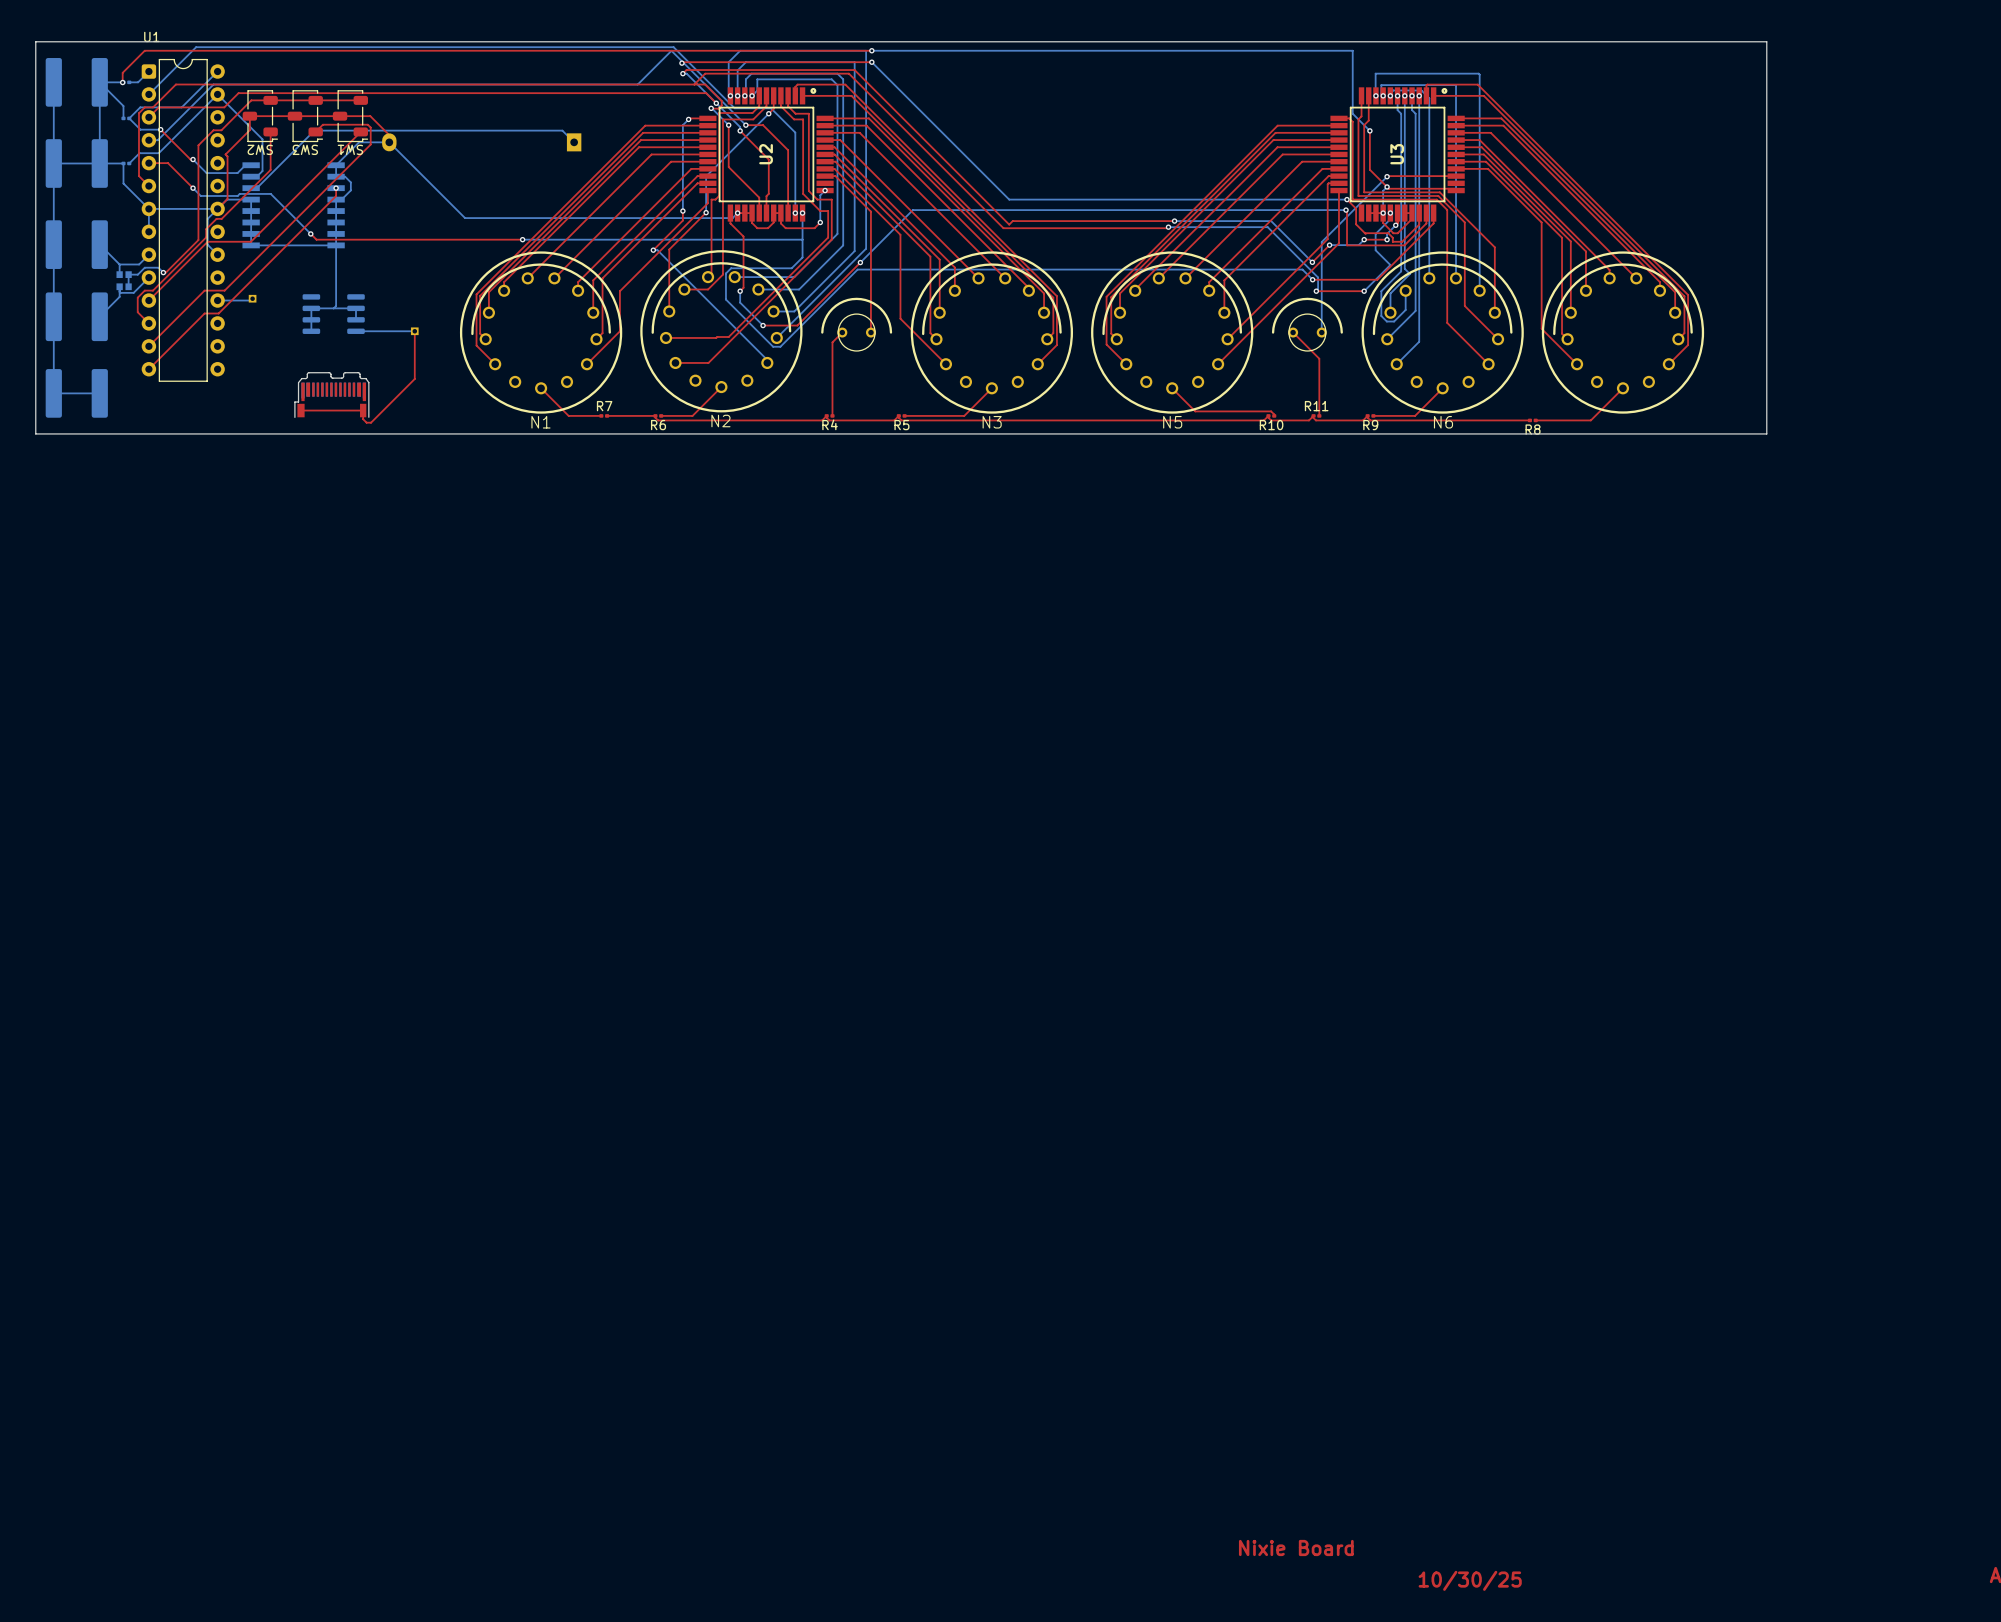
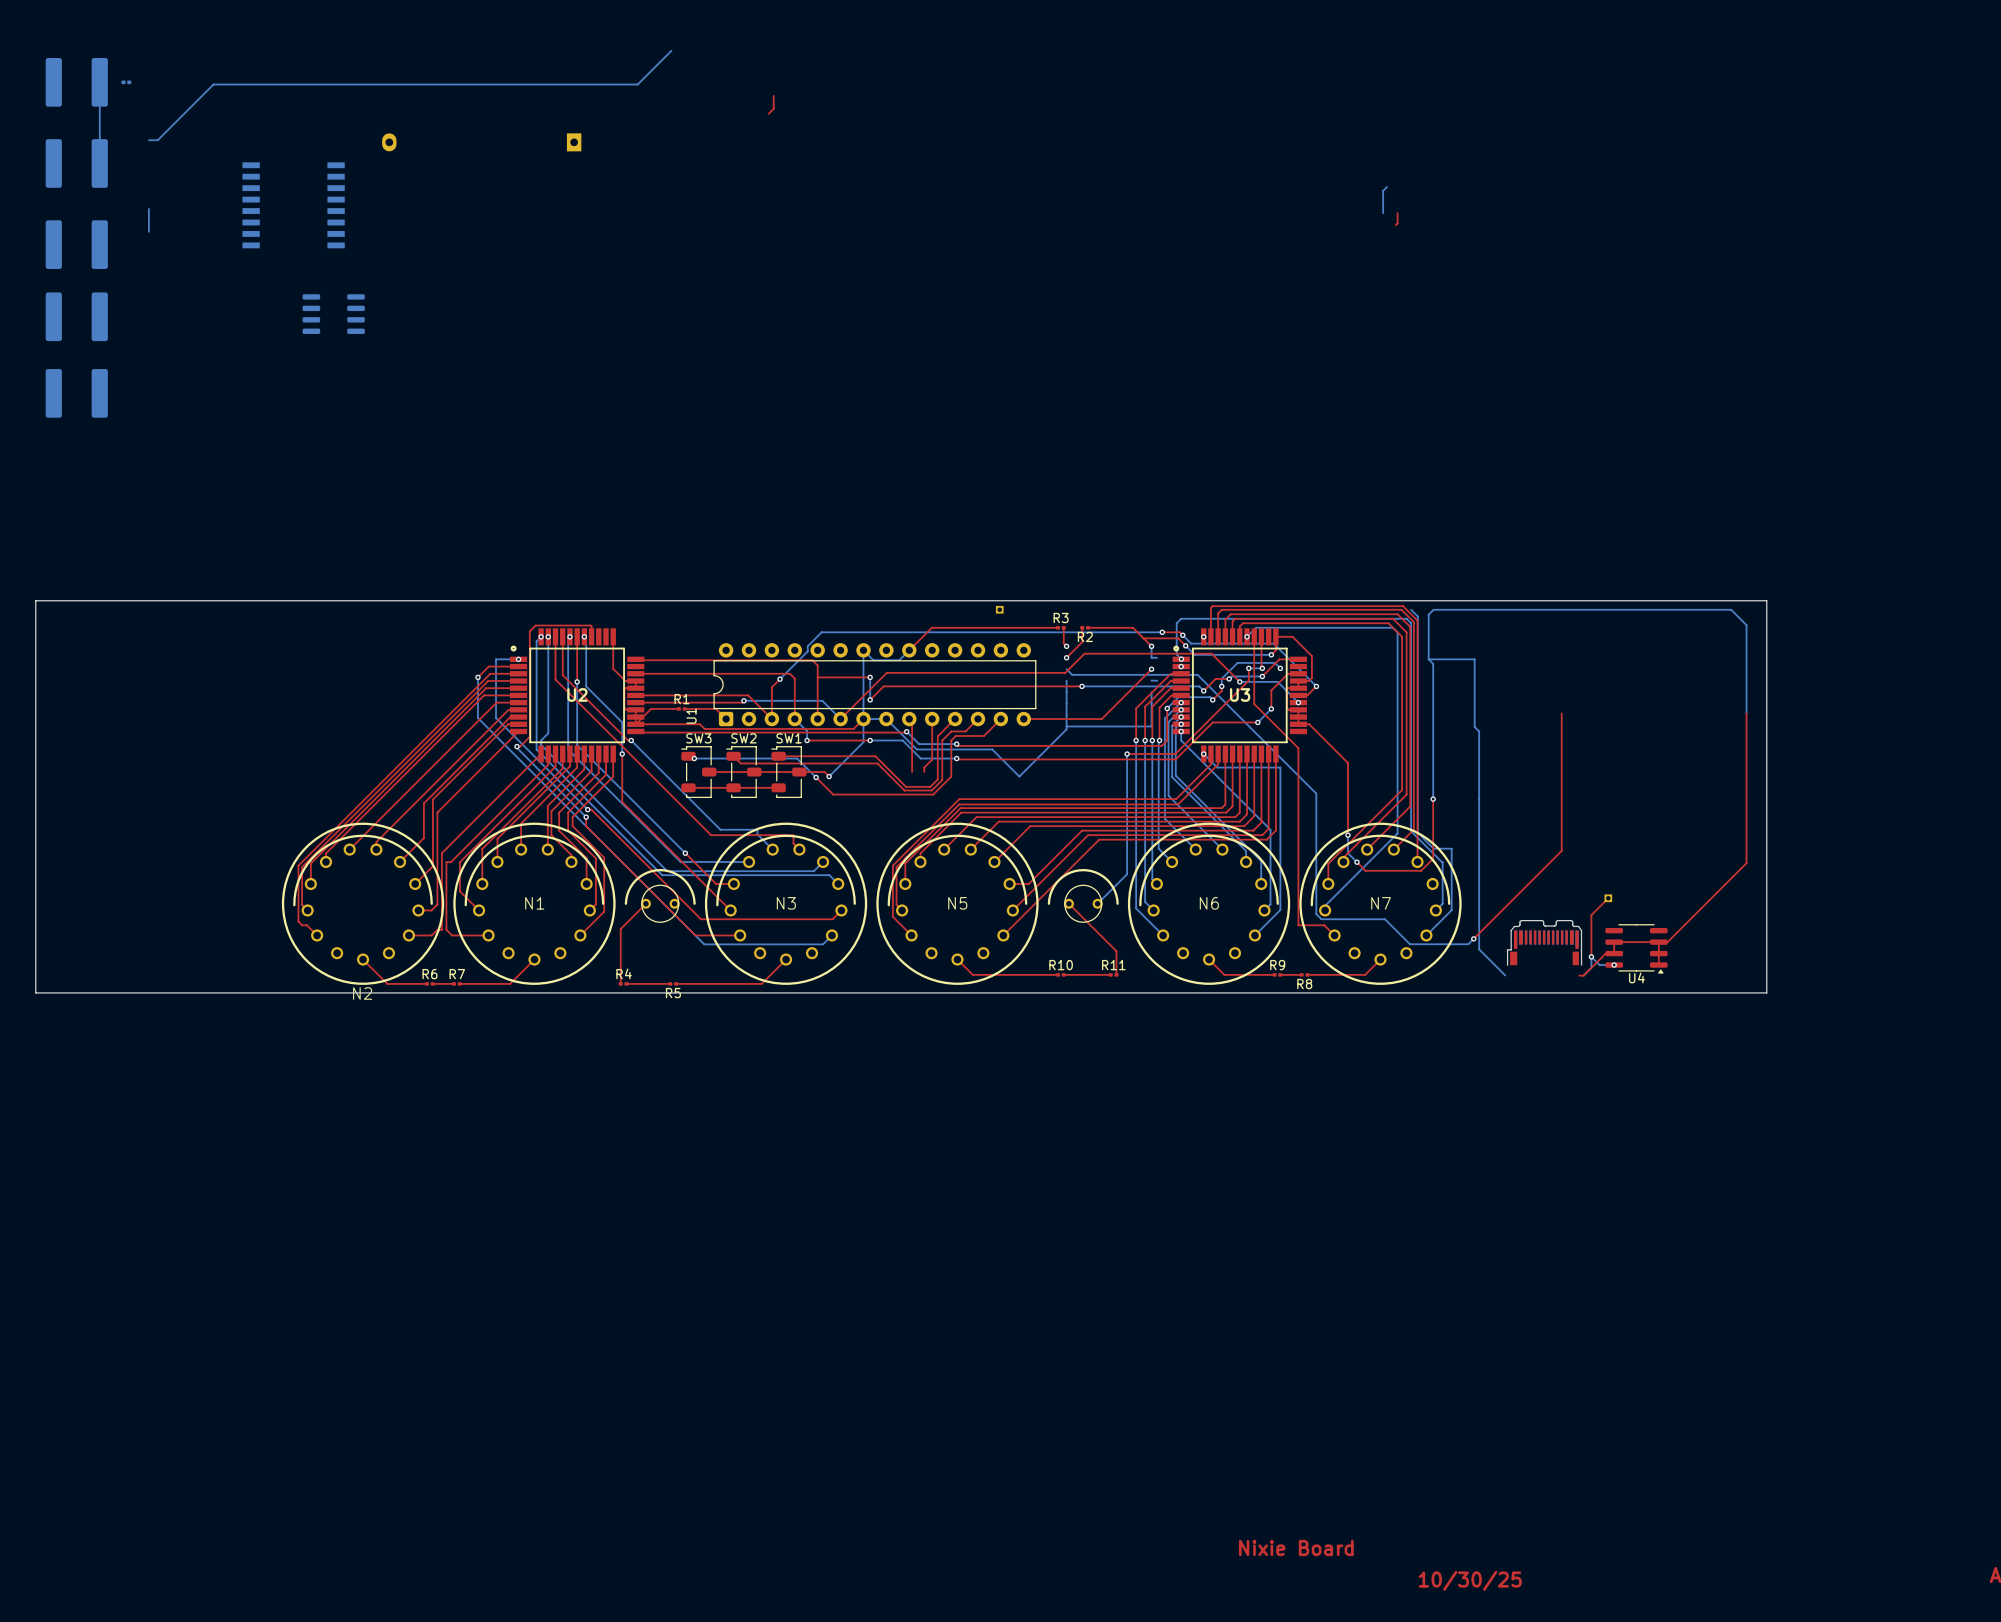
board edge: (35, 41) (1766, 41) (1766, 433) (35, 433) (35, 41) -> none
bottom track: (671, 50) (745, 125) -> none
bottom track: (871, 50) (1352, 50) (1352, 113) (1369, 130) -> none
top track: (871, 50) (144, 50) (122, 72) (122, 82) -> none
via: (871, 50) -> none
bottom track: (871, 62) (1009, 199) (1347, 199) -> none
top track: (871, 62) (681, 63) -> none
via: (871, 62) -> none
via: (681, 63) -> none
bottom track: (148, 71) (138, 82) (129, 82) -> none
bottom track: (217, 71) (181, 107) (140, 107) (129, 118) (140, 129) (160, 129) -> none
bottom track: (682, 73) (686, 73) (740, 127) (740, 130) -> none
top track: (682, 73) (686, 70) (854, 70) (1009, 224) (1012, 221) (1174, 221) -> none
via: (682, 73) -> none
bottom track: (53, 82) (53, 393) (99, 393) -> none
via: (122, 82) -> none
bottom track: (123, 82) (99, 82) (123, 106) (123, 118) -> none
top track: (694, 84) (705, 73) (848, 73) (1003, 228) (1168, 227) -> none
bottom track: (148, 94) (196, 47) (673, 47) (734, 108) (771, 108) (795, 132) (795, 213) -> none
bottom track: (730, 95) (728, 94) (728, 62) (740, 50) (866, 50) (866, 248) (776, 337) -> none
via: (730, 95) -> none
bottom track: (737, 95) (737, 70) (745, 62) (854, 62) (854, 251) (794, 311) (773, 311) -> none
via: (737, 95) -> none
bottom track: (744, 95) (745, 79) (751, 73) (837, 73) (843, 79) (843, 245) (799, 289) (758, 289) -> none
via: (744, 95) -> none
bottom track: (752, 95) (757, 90) (757, 79) (831, 79) (837, 85) (837, 233) (794, 277) (734, 277) -> none
via: (752, 95) -> none
top track: (759, 95) (759, 106) (752, 112) (719, 112) (719, 195) (715, 199) (711, 199) (711, 273) (708, 277) -> none
top track: (766, 95) (766, 106) (753, 119) (722, 119) (722, 274) (708, 289) (684, 289) -> none
top track: (780, 95) (780, 106) (794, 119) (803, 119) (803, 193) (820, 211) (828, 211) (828, 237) (728, 336) (666, 337) -> none
top track: (788, 95) (788, 106) (795, 113) (808, 113) (808, 191) (817, 199) (831, 199) (831, 239) (708, 362) (675, 362) -> none
top track: (795, 95) (795, 86) (797, 84) (845, 84) (1056, 296) (1056, 345) (1037, 364) -> none
top track: (802, 95) (851, 95) (1053, 297) (1053, 333) (1047, 339) -> none
top track: (1361, 95) (1361, 116) (1358, 119) (1358, 195) (1438, 195) (1464, 222) (1464, 305) (1498, 339) -> none
top track: (1368, 95) (1368, 120) (1364, 125) (1364, 192) (1439, 192) (1494, 247) (1494, 312) -> none
bottom track: (1375, 95) (1375, 73) (1479, 74) (1479, 290) -> none
via: (1375, 95) -> none
bottom track: (1383, 95) (1381, 85) (1456, 85) (1456, 278) -> none
via: (1383, 95) -> none
bottom track: (1390, 95) (1393, 90) (1421, 90) (1429, 98) (1429, 278) -> none
via: (1390, 95) -> none
via: (1397, 95) -> none
bottom track: (1404, 95) (1404, 268) (1409, 274) (1390, 293) (1390, 312) -> none
via: (1404, 95) -> none
bottom track: (1412, 95) (1412, 110) (1415, 113) (1415, 310) (1387, 339) -> none
via: (1412, 95) -> none
bottom track: (1419, 95) (1419, 341) (1396, 364) -> none
via: (1419, 95) -> none
top track: (1426, 95) (1427, 84) (1477, 84) (1688, 294) (1688, 345) (1668, 364) -> none
top track: (1433, 95) (1483, 95) (1684, 296) (1684, 333) (1678, 339) -> none
bottom track: (1398, 96) (1397, 110) (1401, 113) (1401, 271) (1381, 291) (1381, 316) (1386, 321) (1394, 321) (1405, 310) (1405, 290) -> none
top track: (360, 100) (251, 100) (221, 130) (213, 130) (198, 145) (198, 240) (165, 272) (163, 272) -> none
top track: (716, 103) (706, 93) (238, 93) (224, 107) (158, 107) (148, 117) -> none
via: (716, 103) -> none
bottom track: (711, 108) (728, 125) -> none
top track: (711, 108) (718, 108) (721, 105) (721, 100) (705, 84) (175, 84) (153, 107) (144, 107) (138, 113) (138, 176) (148, 186) -> none
via: (711, 108) -> none
bottom track: (768, 113) (706, 176) (706, 212) -> none
via: (768, 113) -> none
SW2 rotation: 0° (260, 116) -> 180° (743, 772)
SW2 position: (260, 116) -> (743, 772)
SW3 rotation: 0° (305, 116) -> 180° (698, 772)
SW3 position: (305, 116) -> (698, 772)
SW1 rotation: 0° (350, 116) -> 180° (788, 772)
SW1 position: (350, 116) -> (788, 772)
part: (126, 118) -> none
top track: (707, 118) (688, 119) -> none
top track: (825, 118) (868, 118) (1044, 293) (1044, 312) -> none
top track: (1338, 118) (1349, 118) (1352, 121) (1352, 199) (1436, 199) (1447, 209) (1447, 322) (1488, 364) -> none
top track: (1456, 118) (1501, 118) (1675, 292) (1675, 312) -> none
bottom track: (688, 119) (682, 125) (682, 211) -> none
via: (688, 119) -> none
top track: (707, 125) (645, 125) (476, 294) (476, 345) (495, 364) -> none
top track: (728, 125) (728, 167) (759, 197) (759, 213) -> none
via: (728, 125) -> none
top track: (745, 125) (763, 125) (788, 150) (788, 213) -> none
via: (745, 125) -> none
top track: (825, 125) (866, 125) (1028, 287) (1028, 290) -> none
top track: (1338, 125) (1277, 125) (1106, 296) (1106, 344) (1126, 364) -> none
top track: (1456, 125) (1503, 125) (1659, 282) (1659, 290) -> none
top track: (160, 129) (190, 159) (193, 159) -> none
via: (160, 129) -> none
top track: (740, 130) (768, 159) (766, 213) -> none
via: (740, 130) -> none
top track: (1369, 130) (1369, 169) (1388, 188) (1454, 188) (1456, 190) -> none
via: (1369, 130) -> none
top track: (270, 131) (270, 169) (221, 218) (216, 218) (206, 229) (206, 237) (153, 290) (144, 290) (137, 297) (137, 312) (148, 323) -> none
top track: (315, 131) (322, 124) (367, 124) (370, 127) (370, 144) (224, 290) (204, 290) (148, 346) -> none
top track: (360, 131) (250, 241) (207, 241) (148, 300) -> none
top track: (707, 132) (643, 132) (480, 295) (480, 333) (485, 339) -> none
top track: (825, 132) (859, 132) (1005, 278) -> none
top track: (1338, 132) (1275, 132) (1111, 297) (1111, 333) (1116, 339) -> none
top track: (1456, 132) (1490, 132) (1636, 278) -> none
top track: (707, 140) (641, 140) (488, 292) (488, 312) -> none
top track: (825, 140) (840, 140) (978, 278) -> none
top track: (1338, 140) (1273, 140) (1120, 293) (1120, 312) -> none
top track: (1456, 140) (1479, 140) (1609, 270) (1609, 278) -> none
top track: (389, 142) (389, 135) (370, 116) (249, 116) (249, 130) (225, 154) (227, 156) (227, 199) (217, 208) -> none
bottom track: (574, 142) (562, 130) (314, 130) (256, 188) (251, 188) -> none
top track: (707, 147) (639, 147) (504, 282) (504, 290) -> none
top track: (825, 147) (834, 147) (954, 267) (954, 290) -> none
top track: (1338, 147) (1277, 147) (1135, 290) -> none
top track: (1456, 147) (1481, 147) (1585, 251) (1585, 290) -> none
top track: (707, 154) (651, 154) (527, 278) -> none
U2 rotation: 0° (766, 154) -> 90° counterclockwise (577, 695)
U2 position: (766, 154) -> (577, 695)
top track: (825, 154) (834, 154) (939, 259) (939, 312) -> none
top track: (1338, 154) (1282, 154) (1158, 278) -> none
U3 rotation: 0° (1397, 154) -> 90° counterclockwise (1239, 695)
U3 position: (1397, 154) -> (1239, 695)
top track: (1456, 154) (1483, 154) (1570, 241) (1570, 312) -> none
bottom track: (193, 159) (206, 173) (237, 173) (245, 165) (251, 165) -> none
via: (193, 159) -> none
top track: (707, 161) (671, 161) (554, 278) -> none
top track: (825, 161) (835, 161) (930, 256) (930, 333) (936, 339) -> none
top track: (1338, 161) (1302, 161) (1185, 278) -> none
top track: (1456, 161) (1485, 161) (1562, 237) (1562, 333) (1567, 339) -> none
bottom track: (53, 163) (123, 163) (123, 183) (148, 208) (217, 208) -> none
part: (126, 163) -> none
bottom track: (129, 163) (139, 153) (158, 153) (217, 94) (262, 139) (262, 171) (256, 176) (251, 176) -> none
top track: (148, 163) (168, 163) (193, 188) -> none
top track: (707, 168) (691, 168) (578, 282) (578, 290) -> none
top track: (825, 168) (834, 168) (900, 234) (900, 318) (945, 364) -> none
top track: (1338, 168) (1322, 168) (1209, 282) (1209, 290) -> none
top track: (1456, 168) (1488, 168) (1541, 222) (1541, 328) (1577, 364) -> none
top track: (707, 176) (697, 176) (593, 280) (593, 312) -> none
top track: (825, 176) (835, 176) (870, 211) (870, 332) -> none
top track: (1338, 176) (1328, 176) (1224, 280) (1224, 312) -> none
bottom track: (1387, 176) (1321, 242) (1321, 332) -> none
via: (1387, 176) -> none
top track: (1456, 176) (1387, 176) -> none
top track: (707, 183) (697, 183) (602, 278) (602, 333) (596, 339) -> none
top track: (1338, 183) (1327, 184) (1327, 239) (1227, 339) -> none
via: (1387, 186) -> none
bottom track: (193, 188) (200, 195) (270, 193) (310, 233) -> none
via: (193, 188) -> none
top track: (336, 188) (336, 196) (218, 313) (204, 313) (148, 369) -> none
via: (336, 188) -> none
top track: (707, 190) (707, 203) (619, 291) (619, 331) (587, 364) -> none
bottom track: (825, 190) (820, 195) (820, 222) -> none
via: (825, 190) -> none
top track: (1338, 190) (1338, 243) (1218, 364) -> none
top track: (1347, 199) (1356, 208) (1356, 224) (1365, 233) -> none
via: (1347, 199) -> none
bottom track: (1346, 210) (912, 210) (860, 262) -> none
top track: (1346, 210) (1347, 245) (1404, 245) (1426, 223) (1426, 213) -> none
via: (1346, 210) -> none
top track: (682, 211) (682, 220) (653, 250) -> none
via: (682, 211) -> none
top track: (706, 212) (669, 249) (669, 311) -> none
via: (706, 212) -> none
top track: (730, 213) (730, 223) (743, 236) (743, 287) (740, 291) -> none
bottom track: (737, 213) (732, 218) (465, 218) (389, 142) (358, 142) (336, 165) (336, 176) (345, 176) (350, 182) (350, 190) (341, 199) (336, 199) (336, 305) (333, 308) -> none
top track: (737, 213) (752, 213) (752, 222) (757, 228) (768, 228) (773, 222) (773, 213) (780, 213) (780, 223) (785, 228) (814, 228) (820, 222) -> none
via: (737, 213) -> none
via: (795, 213) -> none
bottom track: (802, 213) (802, 257) (791, 268) (731, 268) (725, 273) (725, 299) (773, 346) (780, 346) (857, 269) (1302, 269) (1312, 279) -> none
via: (802, 213) -> none
top track: (1368, 213) (1383, 213) (1383, 222) (1393, 233) (1397, 233) (1412, 218) (1412, 213) (1404, 213) -> none
via: (1383, 213) -> none
bottom track: (1390, 213) (1390, 219) (1375, 233) (1375, 250) (1390, 265) (1364, 291) -> none
via: (1390, 213) -> none
top track: (1419, 213) (1419, 224) (1402, 241) (1392, 241) (1392, 237) (1388, 233) (1364, 233) -> none
top track: (1433, 213) (1433, 223) (1377, 279) (1312, 279) -> none
U1 rotation: 0° (183, 220) -> 90° counterclockwise (874, 684)
U1 position: (183, 220) -> (874, 684)
bottom track: (1174, 221) (1271, 221) (1312, 262) -> none
via: (1174, 221) -> none
via: (820, 222) -> none
bottom track: (1395, 225) (1387, 233) (1387, 239) -> none
via: (1395, 225) -> none
bottom track: (1168, 227) (1267, 227) (1318, 277) (1318, 289) (1316, 291) -> none
via: (1168, 227) -> none
top track: (310, 233) (316, 239) (522, 239) -> none
via: (310, 233) -> none
bottom track: (522, 239) (802, 239) -> none
via: (522, 239) -> none
bottom track: (1364, 239) (1358, 245) (1329, 245) -> none
top track: (1364, 239) (1387, 239) -> none
via: (1364, 239) -> none
via: (1387, 239) -> none
bottom track: (99, 244) (119, 264) -> none
bottom track: (336, 245) (251, 245) (251, 199) (226, 199) (207, 218) (207, 244) (217, 254) -> none
top track: (1329, 245) (1312, 262) -> none
via: (1329, 245) -> none
bottom track: (653, 250) (657, 250) (767, 360) (767, 362) -> none
via: (653, 250) -> none
bottom track: (148, 254) (139, 264) (119, 264) -> none
top track: (860, 262) (797, 325) (763, 325) -> none
via: (860, 262) -> none
via: (1312, 262) -> none
bottom track: (119, 264) (119, 274) -> none
bottom track: (163, 272) (158, 267) (144, 267) (137, 274) (128, 274) (128, 286) -> none
via: (163, 272) -> none
bottom track: (148, 277) (133, 292) (119, 291) -> none
via: (1312, 279) -> none
part: (124, 280) -> none
bottom track: (119, 286) (119, 296) (99, 316) -> none
bottom track: (740, 291) (740, 302) (763, 325) -> none
via: (740, 291) -> none
top track: (1316, 291) (1364, 291) -> none
via: (1316, 291) -> none
via: (1364, 291) -> none
bottom track: (252, 298) (250, 300) (217, 300) -> none
part: (252, 298) -> none
bottom track: (356, 319) (356, 308) (311, 308) (311, 331) -> none
part: (856, 324) -> none
part: (1307, 324) -> none
via: (763, 325) -> none
bottom track: (356, 331) (414, 331) -> none
top track: (414, 331) (414, 378) (371, 422) (366, 422) (363, 419) (363, 410) (301, 410) -> none
part: (414, 331) -> none
N2 position: (721, 331) -> (363, 903)
N1 position: (541, 332) -> (534, 903)
top track: (842, 332) (832, 342) (832, 415) -> none
N3 position: (991, 332) -> (786, 903)
N5 position: (1172, 332) -> (957, 903)
top track: (1293, 332) (1319, 358) (1319, 415) -> none
N6 position: (1442, 332) -> (1209, 903)
part: (1622, 332) -> none
top track: (721, 387) (692, 415) (661, 415) -> none
top track: (541, 388) (568, 415) (601, 415) -> none
top track: (991, 388) (964, 415) (904, 415) -> none
top track: (1172, 388) (1195, 411) (1271, 411) (1274, 415) -> none
top track: (1442, 388) (1415, 415) (1373, 415) -> none
top track: (1622, 388) (1590, 420) (1535, 420) -> none
part: (331, 395) -> none
R7 position: (604, 415) -> (456, 983)
top track: (607, 415) (655, 415) (658, 420) (822, 420) (826, 415) (829, 420) (894, 420) (898, 415) (901, 420) (1263, 420) (1268, 415) (1271, 420) (1309, 420) (1313, 415) -> none
R6 position: (658, 415) -> (429, 983)
R4 position: (829, 415) -> (623, 983)
R5 position: (901, 415) -> (673, 983)
R10 position: (1271, 415) -> (1060, 974)
R11 position: (1316, 415) -> (1113, 974)
R9 position: (1370, 415) -> (1277, 974)
top track: (1312, 416) (1315, 420) (1363, 420) (1367, 415) (1370, 420) (1529, 420) -> none
R8 position: (1532, 420) -> (1304, 974)
N1 name position: N1 (540, 422) -> N1 (534, 903)
N3 name position: N3 (992, 422) -> N3 (786, 903)
N5 name position: N5 (1172, 422) -> N5 (957, 903)
N6 name position: N6 (1443, 422) -> N6 (1209, 903)
R4 name position: R4 (830, 424) -> R4 (624, 973)
R6 name position: R6 (658, 425) -> R6 (430, 974)
R10 name position: R10 (1271, 425) -> R10 (1061, 965)
R9 name position: R9 (1370, 425) -> R9 (1277, 965)
board edge: none -> (35, 600) (1766, 600) (1766, 992) (35, 992) (35, 600)
part: none -> (999, 609)
bottom track: none -> (1411, 609) (1417, 616) (1417, 832) (1433, 848) (1451, 848) (1451, 910) (1426, 935)
top track: none -> (1058, 627) (931, 627) (909, 650)
R3: none -> (1060, 627)
top track: none -> (1063, 627) (1063, 643) (1066, 646)
top track: none -> (1082, 627) (1082, 642) (1066, 657)
R2: none -> (1085, 627)
top track: none -> (1088, 627) (1133, 627) (1151, 646)
bottom track: none -> (1162, 632) (821, 632) (807, 646) (807, 651) (780, 679)
top track: none -> (1162, 632) (1179, 632) (1182, 635)
via: none -> (1162, 632)
bottom track: none -> (1182, 635) (1191, 643) (1273, 643) (1316, 686)
via: none -> (1182, 635)
bottom track: none -> (541, 636) (536, 641) (536, 749) (662, 875) (829, 875) (838, 883)
via: none -> (541, 636)
bottom track: none -> (548, 636) (548, 733) (541, 740) (541, 745) (667, 871) (813, 871) (823, 862)
via: none -> (548, 636)
top track: none -> (555, 636) (555, 679) (711, 835) (793, 835) (793, 843) (799, 849)
top track: none -> (562, 636) (562, 675) (628, 740) (631, 740)
bottom track: none -> (569, 636) (568, 638) (568, 749) (680, 862) (749, 862)
via: none -> (569, 636)
top track: none -> (577, 636) (577, 681)
bottom track: none -> (584, 636) (586, 638) (586, 686) (622, 722) (622, 754)
via: none -> (584, 636)
top track: none -> (591, 636) (590, 625) (535, 625) (529, 631) (529, 736) (520, 746) (516, 746)
top track: none -> (613, 636) (613, 668) (625, 680) (635, 680) (635, 688) (624, 689) (624, 708) (635, 709) (635, 724)
via: none -> (1203, 636)
top track: none -> (1210, 636) (1210, 607) (1212, 606) (1403, 606) (1417, 620) (1417, 862)
top track: none -> (1218, 636) (1218, 613) (1221, 609) (1401, 609) (1413, 622) (1413, 829) (1393, 849)
top track: none -> (1225, 636) (1225, 619) (1230, 614) (1397, 614) (1410, 626) (1410, 806) (1367, 849)
top track: none -> (1232, 636) (1232, 621) (1235, 618) (1393, 618) (1406, 632) (1406, 794) (1343, 857) (1343, 862)
top track: none -> (1239, 636) (1239, 626) (1242, 623) (1388, 623) (1402, 636) (1402, 790) (1328, 863) (1328, 883)
bottom track: none -> (1247, 636) (1256, 627) (1393, 627) (1397, 632) (1397, 833) (1325, 905) (1325, 910)
via: none -> (1247, 636)
top track: none -> (1254, 636) (1254, 704) (1298, 748) (1298, 925) (1324, 925) (1334, 935)
top track: none -> (1261, 636) (1262, 668)
top track: none -> (1143, 638) (1178, 638) (1185, 645)
bottom track: none -> (1185, 645) (1194, 654) (1271, 654)
via: none -> (1185, 645)
via: none -> (1066, 646)
bottom track: none -> (1151, 646) (1151, 657) (1157, 657)
via: none -> (1151, 646)
bottom track: none -> (909, 650) (899, 660) (873, 660) (863, 650) (863, 742) (829, 776)
top track: none -> (1271, 654) (1275, 650) (1275, 636) (1292, 636) (1311, 656) (1311, 677) (1308, 680) (1298, 680) (1298, 688) (1287, 689) (1287, 708) (1298, 709) (1298, 724) (1309, 724) (1347, 763) (1347, 835)
via: none -> (1271, 654)
via: none -> (1066, 657)
bottom track: none -> (518, 659) (496, 659) (496, 717) (587, 809)
via: none -> (518, 659)
top track: none -> (635, 659) (812, 660) (817, 665) (817, 719)
bottom track: none -> (1181, 659) (1176, 654) (1176, 623) (1181, 618) (1406, 618) (1411, 623) (1411, 831) (1442, 862) (1442, 903) (1435, 910)
via: none -> (1181, 659)
top track: none -> (1298, 659) (1279, 659) (1262, 676)
bottom track: none -> (1428, 659) (1474, 659) (1474, 726) (1479, 731) (1479, 949) (1505, 975)
bottom track: none -> (1428, 659) (1428, 614) (1433, 609) (1731, 609) (1746, 625) (1746, 713)
bottom track: none -> (1428, 659) (1433, 663) (1433, 799)
top track: none -> (518, 666) (488, 666) (477, 677)
via: none -> (1181, 666)
bottom track: none -> (1248, 668) (1262, 668)
top track: none -> (1248, 668) (1248, 680) (1175, 754) (1127, 754)
via: none -> (1248, 668)
via: none -> (1262, 668)
bottom track: none -> (1280, 668) (1274, 662) (1237, 662) (1221, 678) (1221, 686)
via: none -> (1280, 668)
bottom track: none -> (1066, 669) (1072, 674) (1197, 674) (1316, 793) (1316, 914) (1321, 919) (1384, 919) (1409, 944) (1468, 944) (1473, 938)
top track: none -> (1151, 669) (1101, 719) (1023, 719)
via: none -> (1151, 669)
top track: none -> (518, 673) (490, 673) (298, 865) (298, 921) (302, 925) (306, 925) (317, 935)
top track: none -> (635, 673) (789, 673) (794, 678) (794, 719)
top track: none -> (1181, 673) (1170, 673) (1136, 708) (1136, 740)
top track: none -> (1298, 673) (1288, 673) (1271, 690) (1271, 708)
bottom track: none -> (1262, 676) (1231, 676) (1229, 678)
via: none -> (1262, 676)
bottom track: none -> (477, 677) (477, 718) (704, 944) (823, 944) (831, 935)
via: none -> (477, 677)
top track: none -> (817, 677) (870, 677)
bottom track: none -> (870, 677) (870, 699)
via: none -> (870, 677)
top track: none -> (1229, 678) (1215, 678) (1203, 690)
via: none -> (1229, 678)
top track: none -> (780, 679) (771, 687) (771, 719) (748, 695) (635, 695)
via: none -> (780, 679)
top track: none -> (518, 680) (488, 680) (302, 867) (302, 904) (307, 910)
bottom track: none -> (1066, 680) (1066, 729) (1019, 776) (992, 749) (916, 749) (886, 719) (863, 719)
bottom track: none -> (1151, 680) (1157, 680)
top track: none -> (1181, 680) (1170, 680) (1145, 706) (1145, 740)
bottom track: none -> (577, 681) (577, 745) (685, 853)
via: none -> (577, 681)
bottom track: none -> (1239, 681) (1277, 681) (1298, 702)
top track: none -> (1239, 681) (1211, 653) (1084, 653) (1065, 672) (886, 672) (840, 719)
via: none -> (1239, 681)
bottom track: none -> (1082, 686) (1199, 686) (1203, 690)
top track: none -> (1082, 686) (883, 686) (870, 699)
via: none -> (1082, 686)
top track: none -> (1221, 686) (1221, 690) (1212, 699)
via: none -> (1221, 686)
top track: none -> (1316, 686) (1307, 695) (1298, 695)
via: none -> (1316, 686)
top track: none -> (518, 688) (486, 688) (310, 863) (310, 883)
top track: none -> (1181, 688) (1170, 688) (1152, 706) (1152, 740)
via: none -> (1203, 690)
bottom track: none -> (1151, 692) (1151, 726) (1066, 726)
top track: none -> (518, 695) (484, 695) (326, 853) (326, 862)
top track: none -> (1181, 695) (1171, 695) (1159, 707) (1159, 740)
via: none -> (870, 699)
bottom track: none -> (1212, 699) (1210, 697) (1178, 697) (1167, 708)
via: none -> (1212, 699)
bottom track: none -> (743, 700) (822, 700) (840, 719)
top track: none -> (743, 700) (742, 702) (635, 702)
via: none -> (743, 700)
top track: none -> (518, 702) (496, 702) (349, 849)
bottom track: none -> (1181, 702) (1164, 718) (1164, 818) (1195, 849)
via: none -> (1181, 702)
via: none -> (1298, 702)
top track: none -> (678, 708) (651, 708) (635, 724)
R1: none -> (681, 708)
top track: none -> (684, 708) (716, 708) (726, 719)
top track: none -> (1167, 708) (1167, 740) (1161, 745) (958, 745) (956, 744)
via: none -> (1167, 708)
bottom track: none -> (1271, 708) (1257, 722)
via: none -> (1271, 708)
top track: none -> (518, 709) (508, 709) (376, 842) (376, 849)
bottom track: none -> (1181, 709) (1168, 722) (1168, 795) (1222, 849)
via: none -> (1181, 709)
top track: none -> (1561, 713) (1561, 850) (1473, 938)
top track: none -> (1746, 713) (1746, 863) (1667, 942) (1614, 942) (1614, 953) (1605, 953) (1583, 975) (1579, 975)
top track: none -> (518, 717) (510, 717) (423, 803) (423, 838) (400, 862)
bottom track: none -> (1181, 717) (1172, 725) (1172, 777) (1246, 851) (1246, 862)
via: none -> (1181, 717)
bottom track: none -> (794, 719) (807, 731) (807, 740)
top track: none -> (863, 719) (853, 728) (704, 728) (699, 724) (635, 724)
top track: none -> (909, 719) (912, 721) (912, 772)
top track: none -> (932, 719) (932, 759) (924, 767) (924, 772)
top track: none -> (955, 719) (937, 735) (937, 779) (930, 786) (906, 786) (875, 756) (778, 756)
top track: none -> (977, 719) (965, 731) (951, 731) (942, 740) (942, 780) (931, 790) (904, 790) (877, 763) (740, 763) (733, 756)
top track: none -> (1000, 719) (983, 735) (955, 735) (951, 740) (951, 776) (933, 794) (833, 794) (816, 777)
top track: none -> (1257, 722) (1212, 722) (1175, 759) (956, 758)
via: none -> (1257, 722)
top track: none -> (518, 724) (508, 724) (432, 799) (432, 866) (415, 883)
bottom track: none -> (1181, 724) (1175, 727) (1175, 775) (1261, 861) (1261, 883)
via: none -> (1181, 724)
top track: none -> (518, 731) (437, 812) (437, 904) (431, 910) (418, 910)
top track: none -> (635, 731) (906, 731)
bottom track: none -> (906, 731) (919, 744) (956, 744)
via: none -> (906, 731)
bottom track: none -> (1181, 731) (1181, 740) (1270, 829) (1270, 904) (1264, 910)
via: none -> (1181, 731)
bottom track: none -> (631, 740) (720, 829) (757, 829) (757, 834) (772, 849)
via: none -> (631, 740)
top track: none -> (807, 740) (870, 740)
via: none -> (807, 740)
bottom track: none -> (870, 740) (902, 740) (920, 758) (956, 758)
via: none -> (870, 740)
bottom track: none -> (1136, 740) (1136, 908) (1163, 935)
via: none -> (1136, 740)
bottom track: none -> (1145, 740) (1145, 901) (1153, 910)
via: none -> (1145, 740)
bottom track: none -> (1152, 740) (1152, 879) (1156, 883)
via: none -> (1152, 740)
bottom track: none -> (1159, 740) (1158, 848) (1172, 862)
via: none -> (1159, 740)
via: none -> (956, 744)
bottom track: none -> (516, 746) (586, 817)
via: none -> (516, 746)
top track: none -> (541, 754) (441, 853) (441, 929) (437, 929) (431, 935) (408, 935)
top track: none -> (548, 754) (548, 764) (450, 862) (446, 862) (446, 929) (452, 935) (488, 935)
top track: none -> (555, 754) (555, 766) (459, 862) (459, 891) (479, 910)
top track: none -> (562, 754) (562, 768) (482, 848) (482, 883)
top track: none -> (569, 754) (569, 766) (497, 838) (497, 862)
top track: none -> (577, 754) (577, 767) (521, 823) (521, 849)
top track: none -> (584, 754) (584, 769) (547, 805) (547, 849)
top track: none -> (591, 754) (591, 771) (551, 811) (551, 835) (571, 855) (571, 862)
top track: none -> (598, 754) (598, 772) (559, 812) (559, 830) (586, 858) (586, 883)
top track: none -> (606, 754) (606, 774) (568, 812) (568, 830) (595, 858) (595, 904) (589, 910)
top track: none -> (613, 754) (613, 776) (572, 817) (572, 826) (604, 857) (604, 911) (580, 935)
top track: none -> (622, 754) (622, 802) (730, 910)
via: none -> (622, 754)
bottom track: none -> (1127, 754) (1127, 874) (1097, 903)
via: none -> (1127, 754)
bottom track: none -> (1203, 754) (1217, 767) (1280, 767) (1280, 910) (1254, 935)
via: none -> (1203, 754)
top track: none -> (1210, 754) (1210, 764) (1176, 799) (959, 799) (892, 865) (892, 916) (911, 935)
top track: none -> (1218, 754) (1218, 764) (1178, 804) (959, 804) (896, 867) (896, 904) (902, 910)
top track: none -> (1225, 754) (1225, 804) (1221, 808) (960, 808) (905, 863) (905, 883)
top track: none -> (1232, 754) (1232, 806) (1226, 812) (961, 812) (920, 853) (920, 862)
top track: none -> (1239, 754) (1239, 812) (1235, 817) (976, 817) (944, 849)
top track: none -> (1247, 754) (1247, 814) (1239, 821) (998, 821) (970, 849)
top track: none -> (1254, 754) (1254, 816) (1244, 826) (1030, 826) (994, 862)
top track: none -> (1261, 754) (1262, 821) (1253, 830) (1082, 830) (1028, 883) (1009, 883)
top track: none -> (1268, 754) (1268, 828) (1262, 835) (1088, 835) (1012, 910)
top track: none -> (1275, 754) (1275, 830) (1266, 839) (1099, 839) (1003, 935)
bottom track: none -> (694, 758) (797, 758) (816, 777)
via: none -> (694, 758)
via: none -> (956, 758)
top track: none -> (709, 772) (824, 772) (829, 776)
via: none -> (829, 776)
via: none -> (816, 777)
top track: none -> (688, 787) (778, 787)
top track: none -> (1433, 799) (1433, 858) (1421, 870) (1365, 870) (1357, 862)
via: none -> (1433, 799)
top track: none -> (587, 809) (591, 809) (700, 919) (832, 919) (841, 910)
via: none -> (587, 809)
top track: none -> (586, 817) (586, 826) (695, 935) (740, 935)
via: none -> (586, 817)
bottom track: none -> (1347, 835) (1347, 853) (1357, 862)
via: none -> (1347, 835)
top track: none -> (685, 853) (716, 883) (733, 883)
via: none -> (685, 853)
via: none -> (1357, 862)
part: none -> (660, 895)
part: none -> (1083, 895)
top track: none -> (1608, 898) (1591, 915) (1591, 956)
part: none -> (1608, 898)
top track: none -> (645, 903) (620, 928) (620, 983)
top track: none -> (1068, 903) (1116, 951) (1116, 974)
N7: none -> (1380, 903)
via: none -> (1473, 938)
part: none -> (1544, 942)
top track: none -> (1658, 942) (1658, 965)
U4: none -> (1636, 948)
via: none -> (1591, 956)
top track: none -> (363, 959) (387, 983) (426, 983)
top track: none -> (534, 959) (510, 983) (459, 983)
top track: none -> (786, 959) (761, 983) (676, 983)
top track: none -> (957, 959) (972, 974) (1058, 974)
top track: none -> (1209, 959) (1224, 974) (1274, 974)
top track: none -> (1380, 959) (1365, 974) (1307, 974)
bottom track: none -> (1614, 965) (1599, 965) (1591, 956) (1591, 967) (1583, 975)
via: none -> (1614, 965)
top track: none -> (1063, 974) (1110, 974)
top track: none -> (1280, 974) (1301, 974)
top track: none -> (432, 983) (453, 983)
top track: none -> (626, 983) (670, 983)

